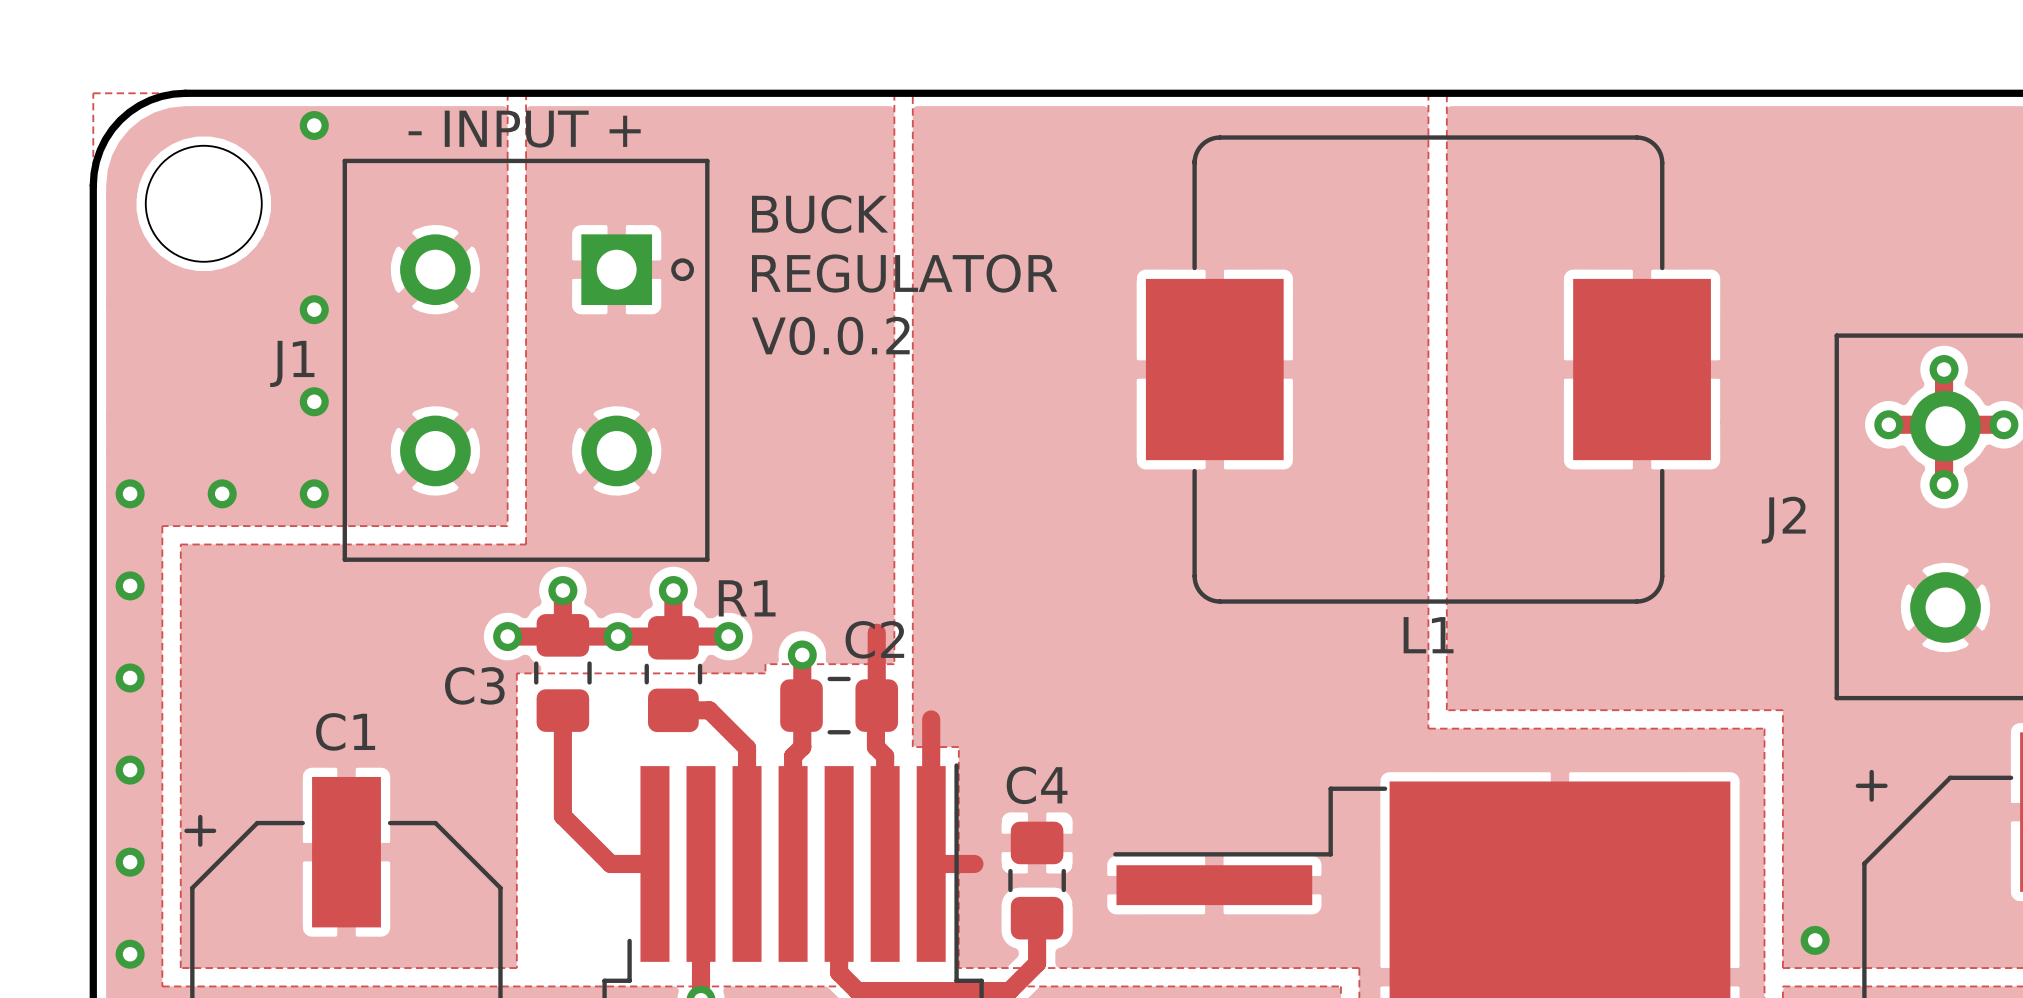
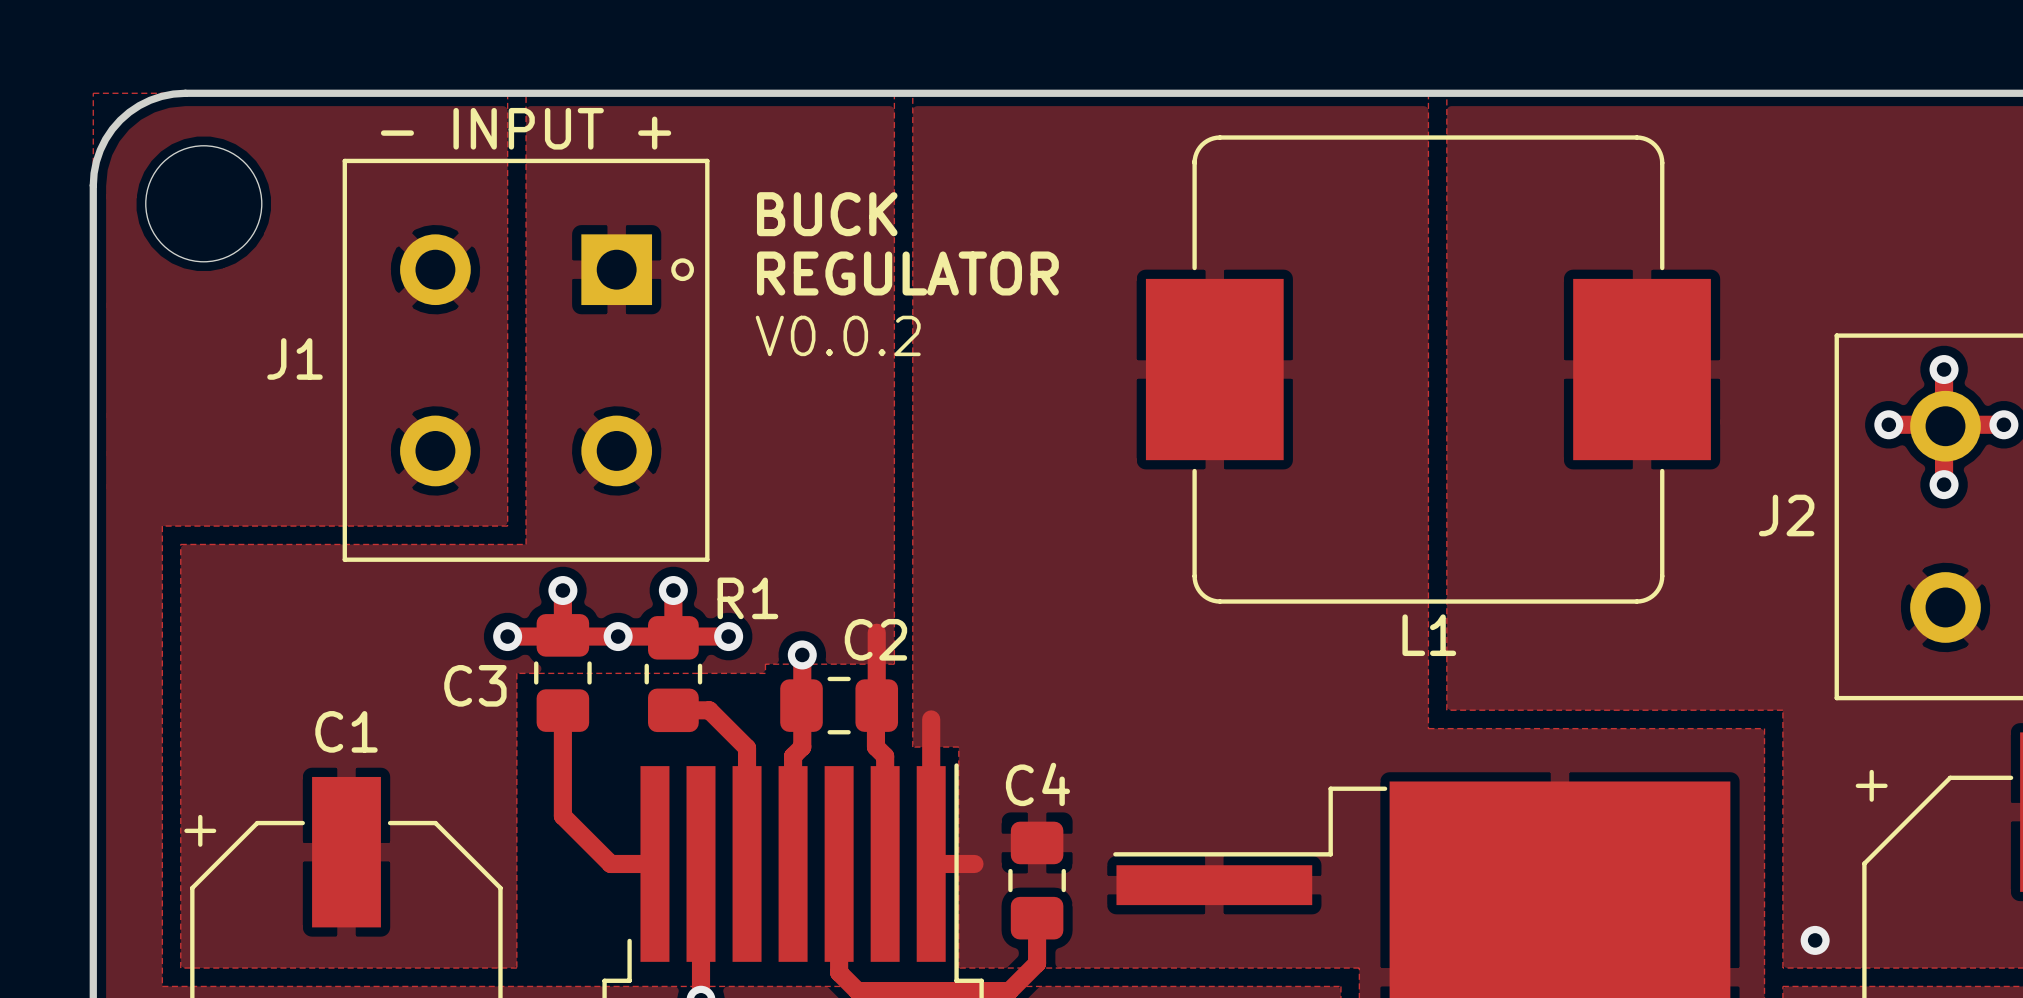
via: (314, 125) -> none
via: (314, 309) -> none
via: (314, 401) -> none
via: (130, 493) -> none
via: (222, 493) -> none
via: (314, 493) -> none
via: (130, 585) -> none
via: (130, 677) -> none
via: (130, 770) -> none
via: (130, 862) -> none
via: (130, 954) -> none

